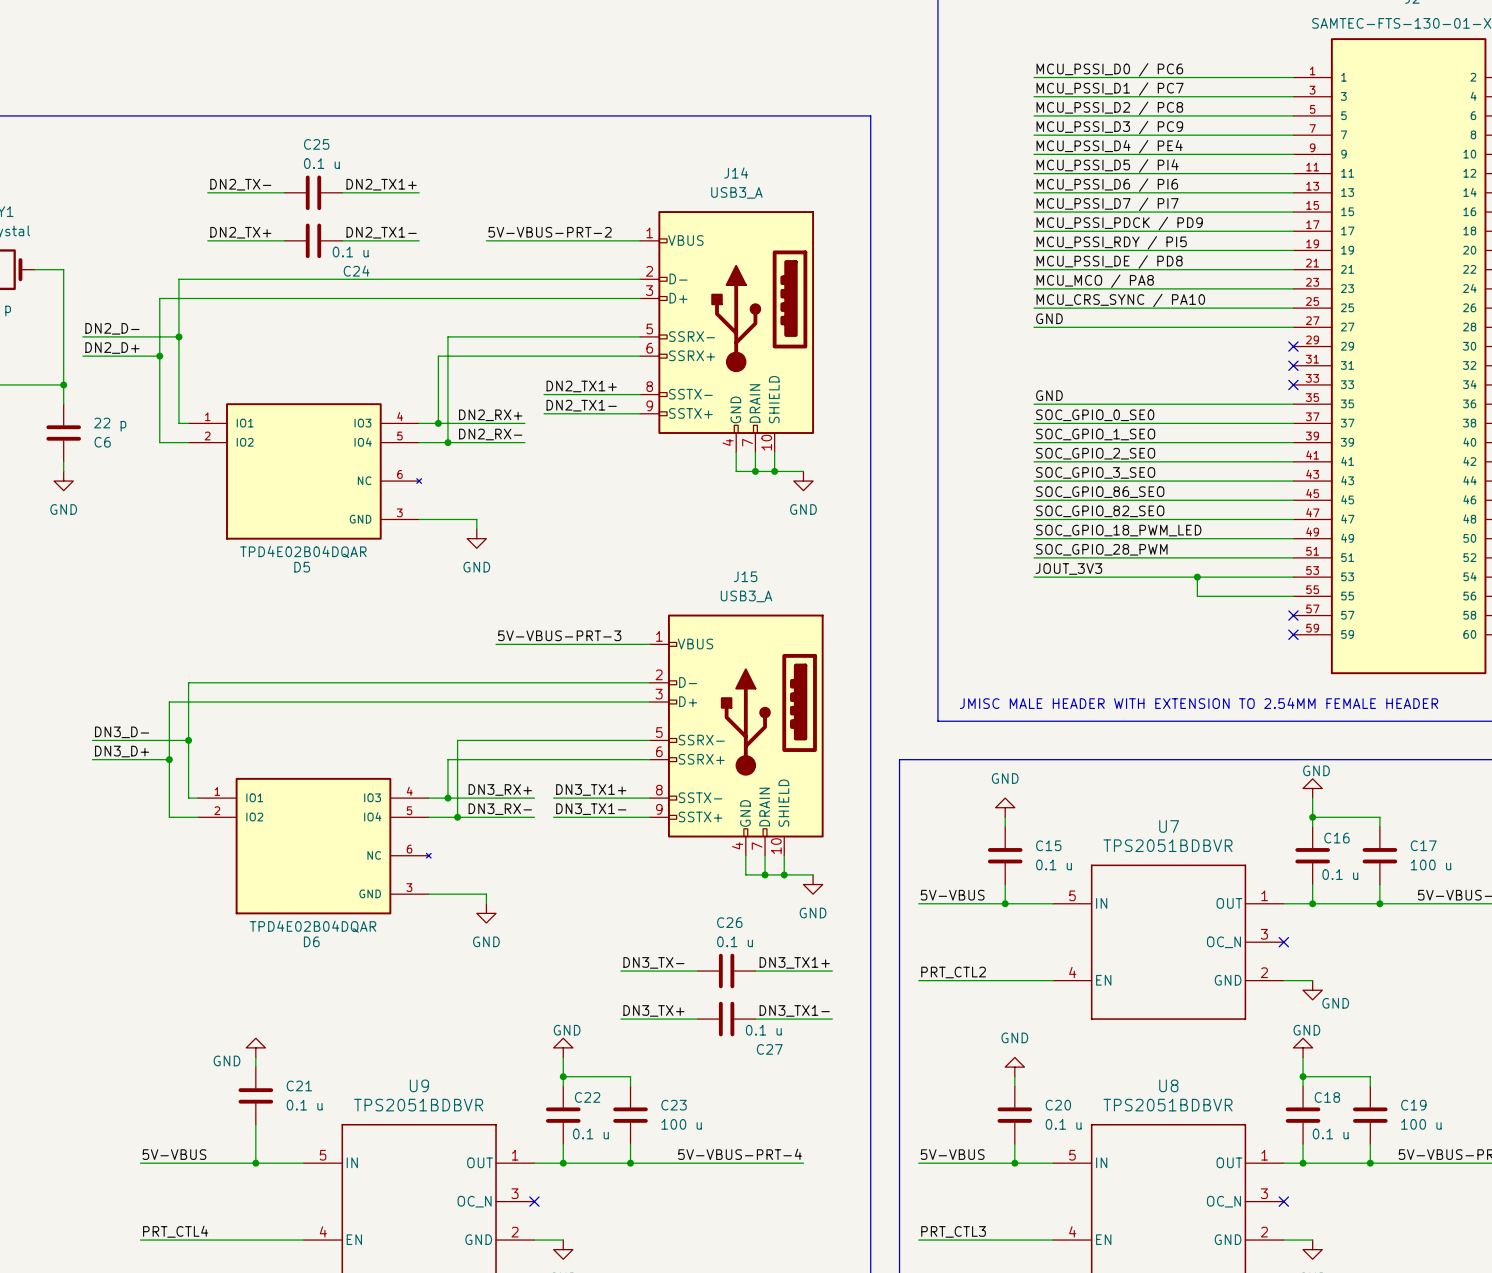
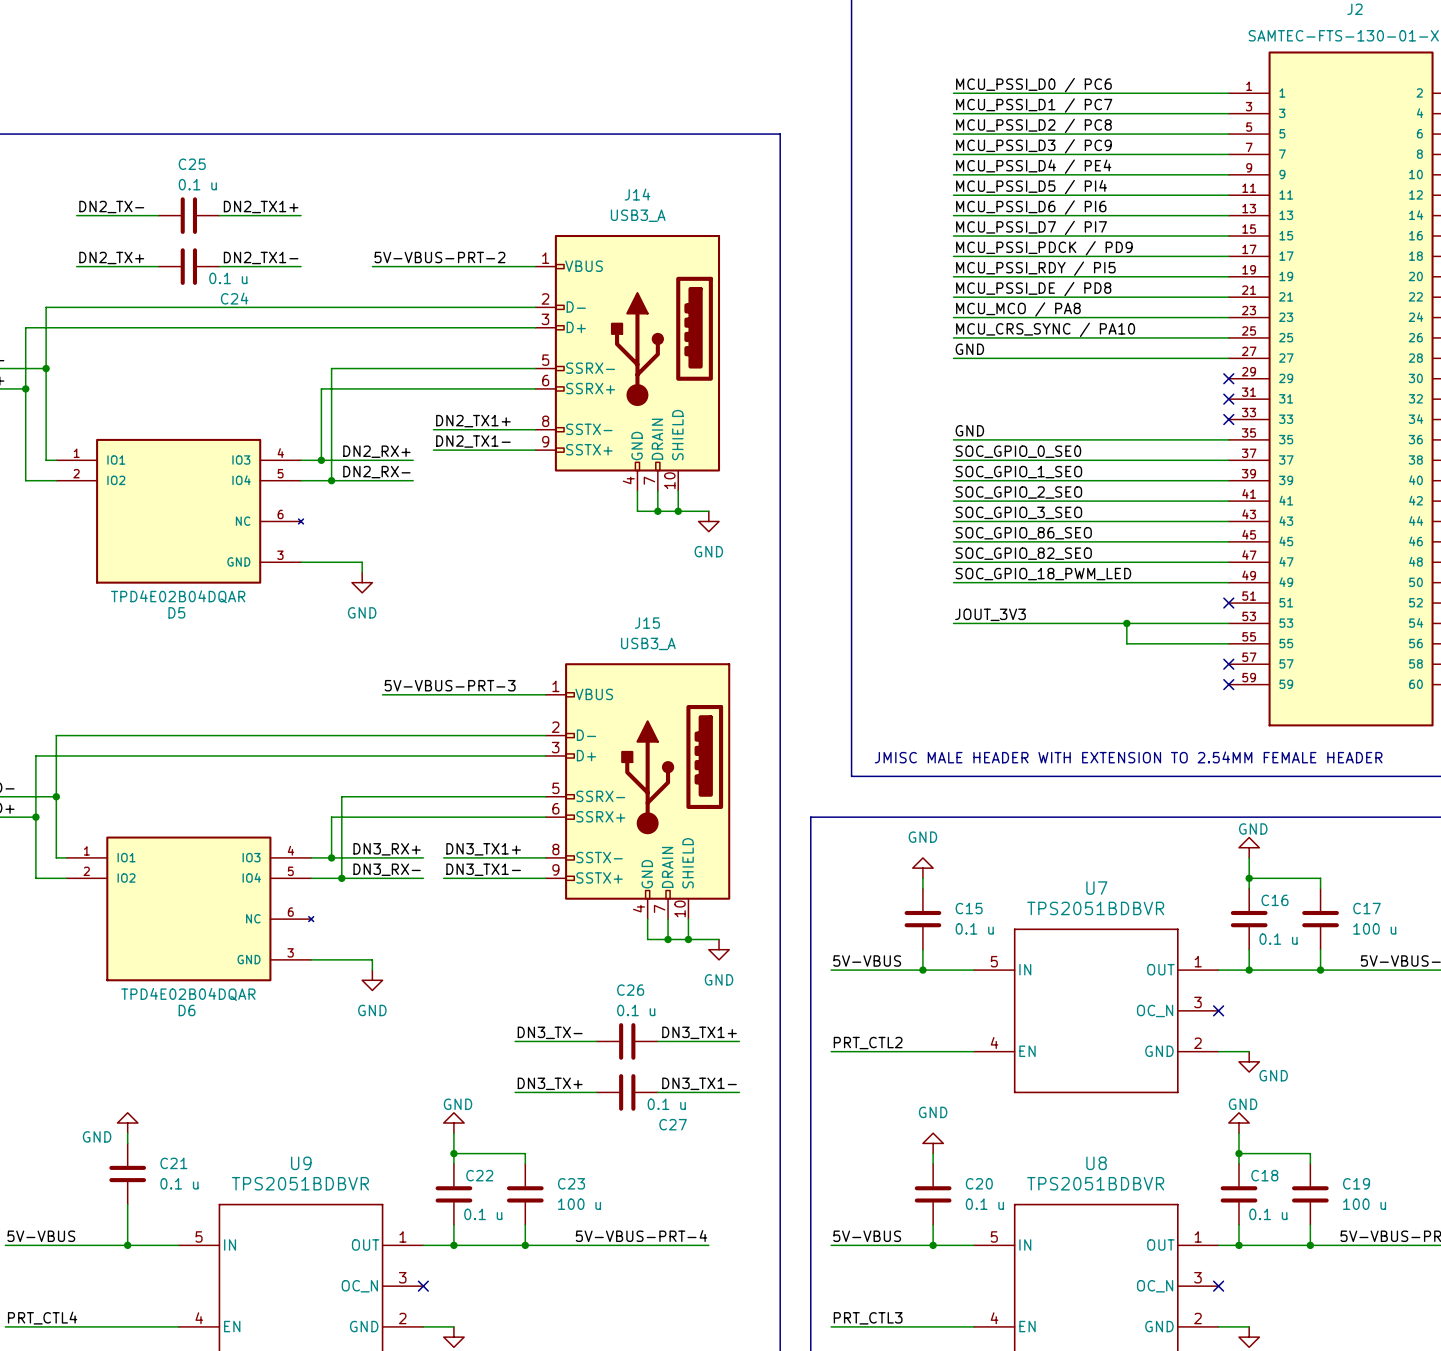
label: SOC_GPIO_28_PWM (1101, 549) -> none
wire: (1034, 557) (1293, 557) -> none
no-connect mark: none -> (1228, 603)

